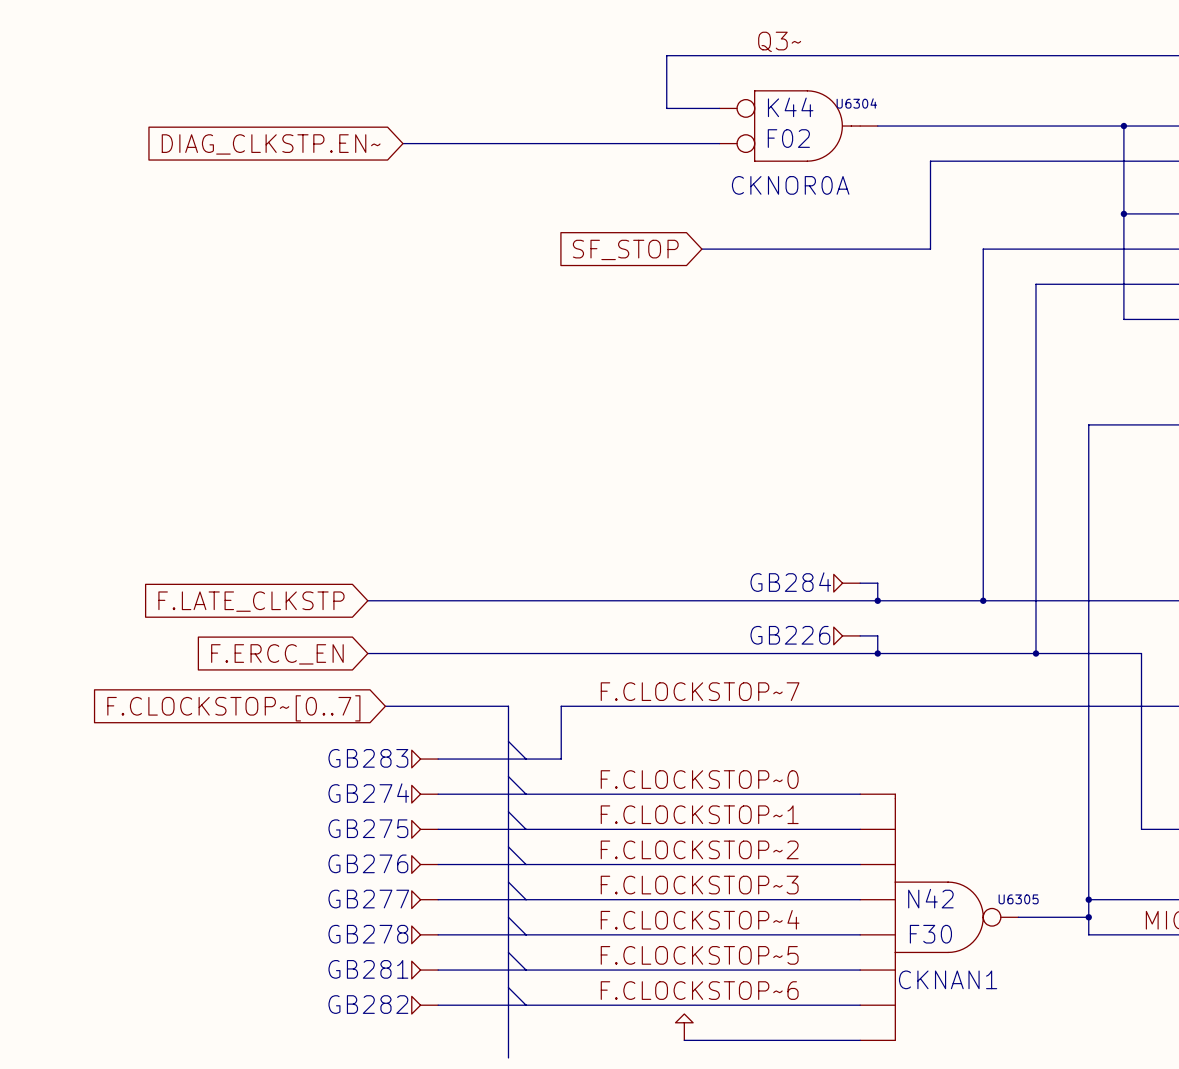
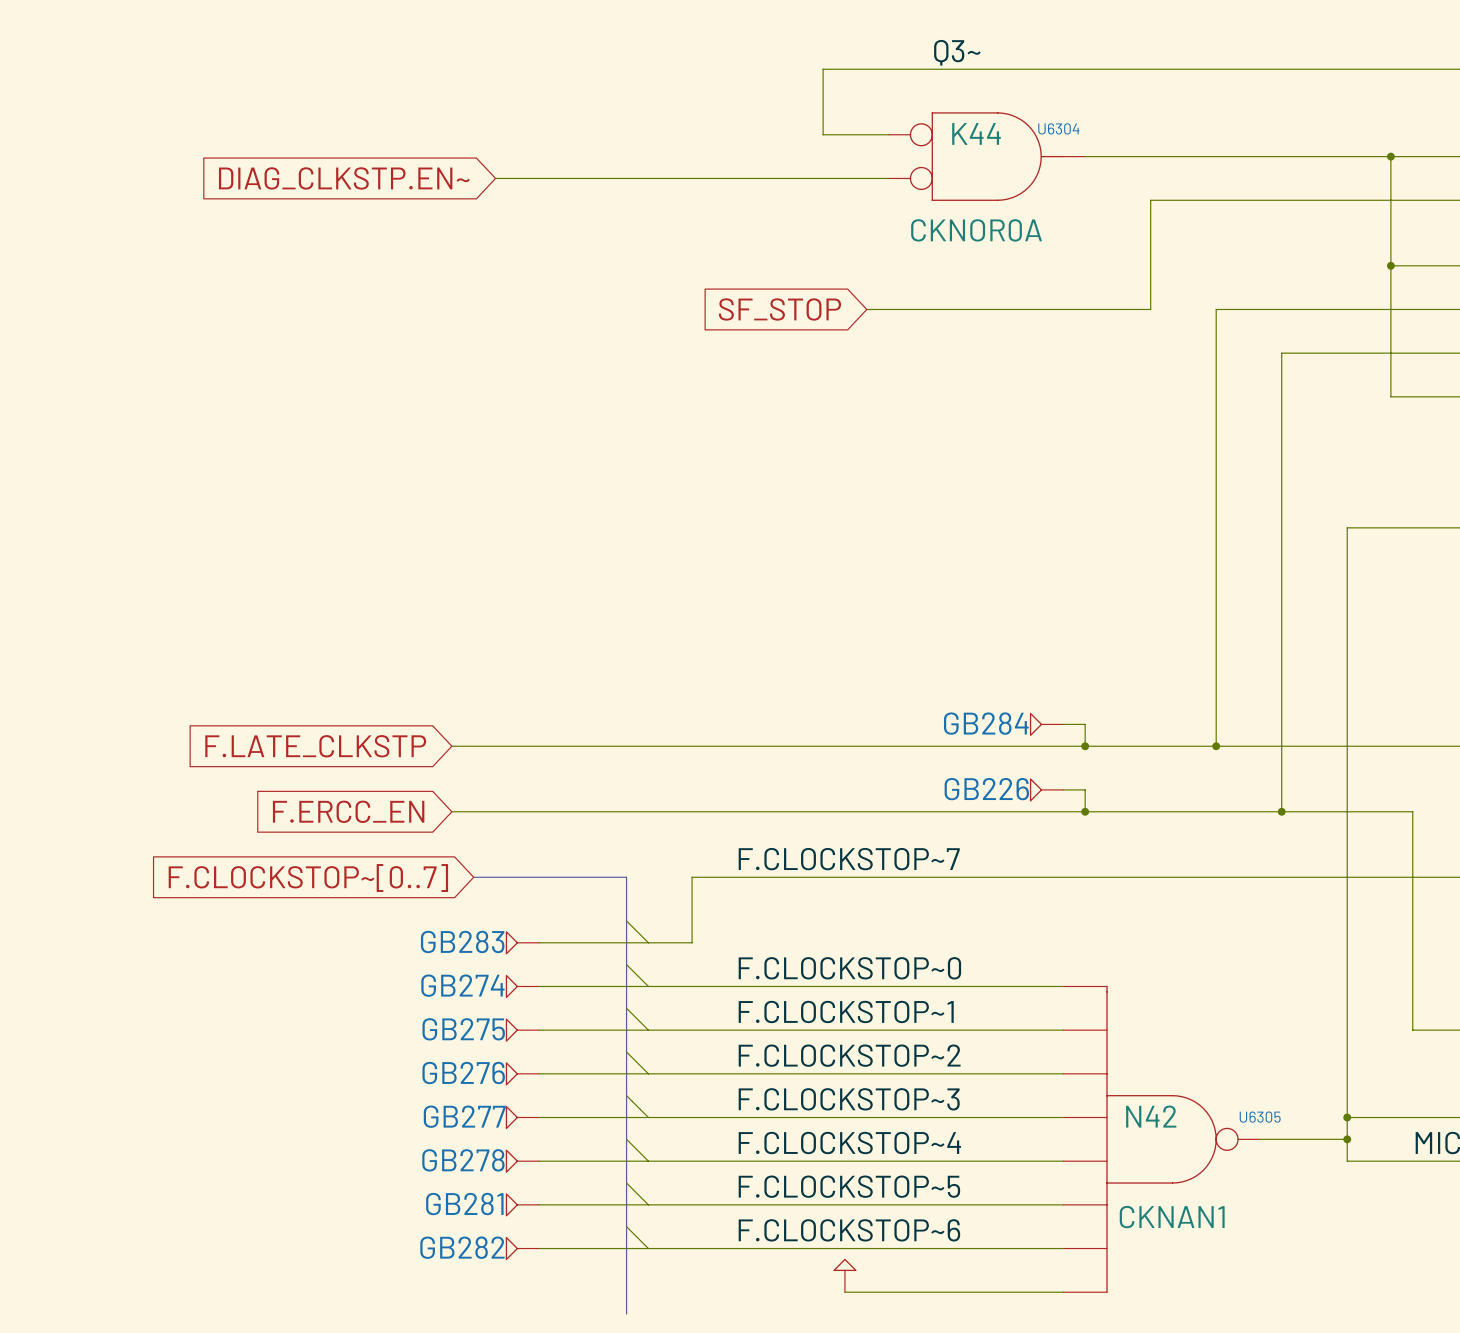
U6304 value: F02 (788, 138) -> none
U6305 value: F30 (930, 934) -> none

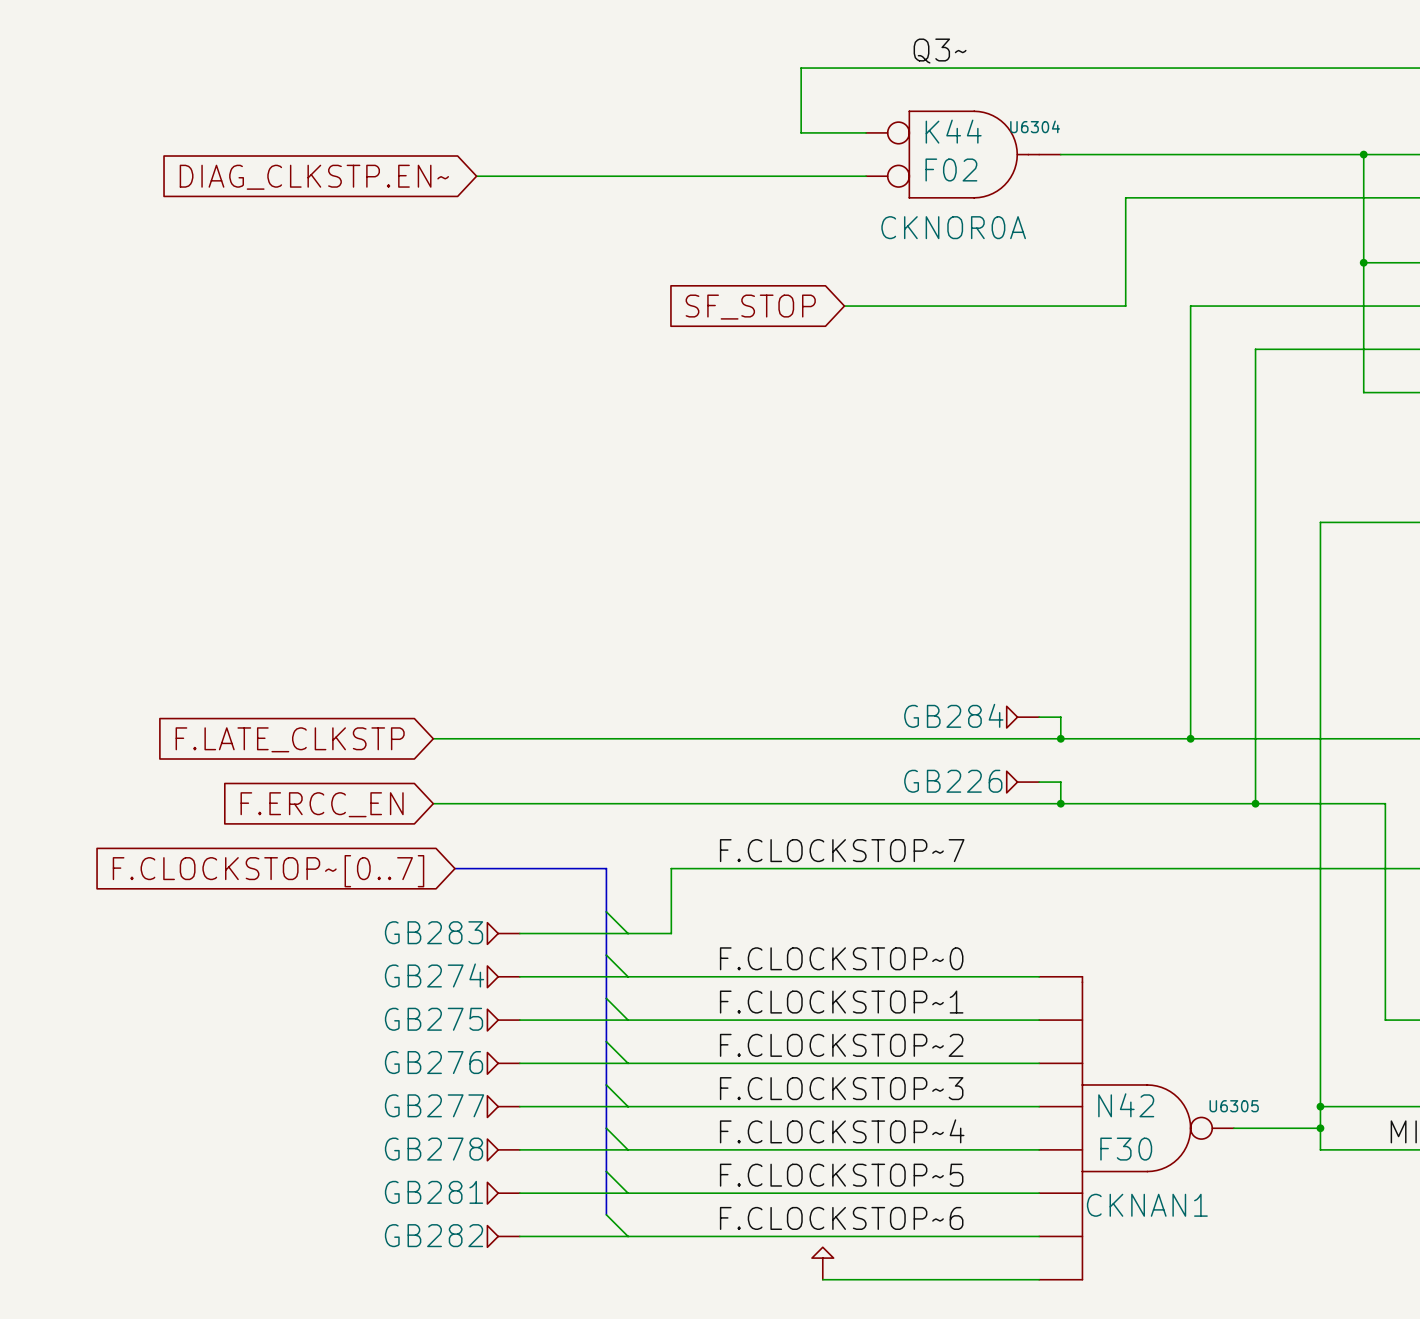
U6304 value: none -> F02 (951, 169)
U6305 value: none -> F30 (1126, 1149)
bus: (626, 1226) (626, 1314) -> none

